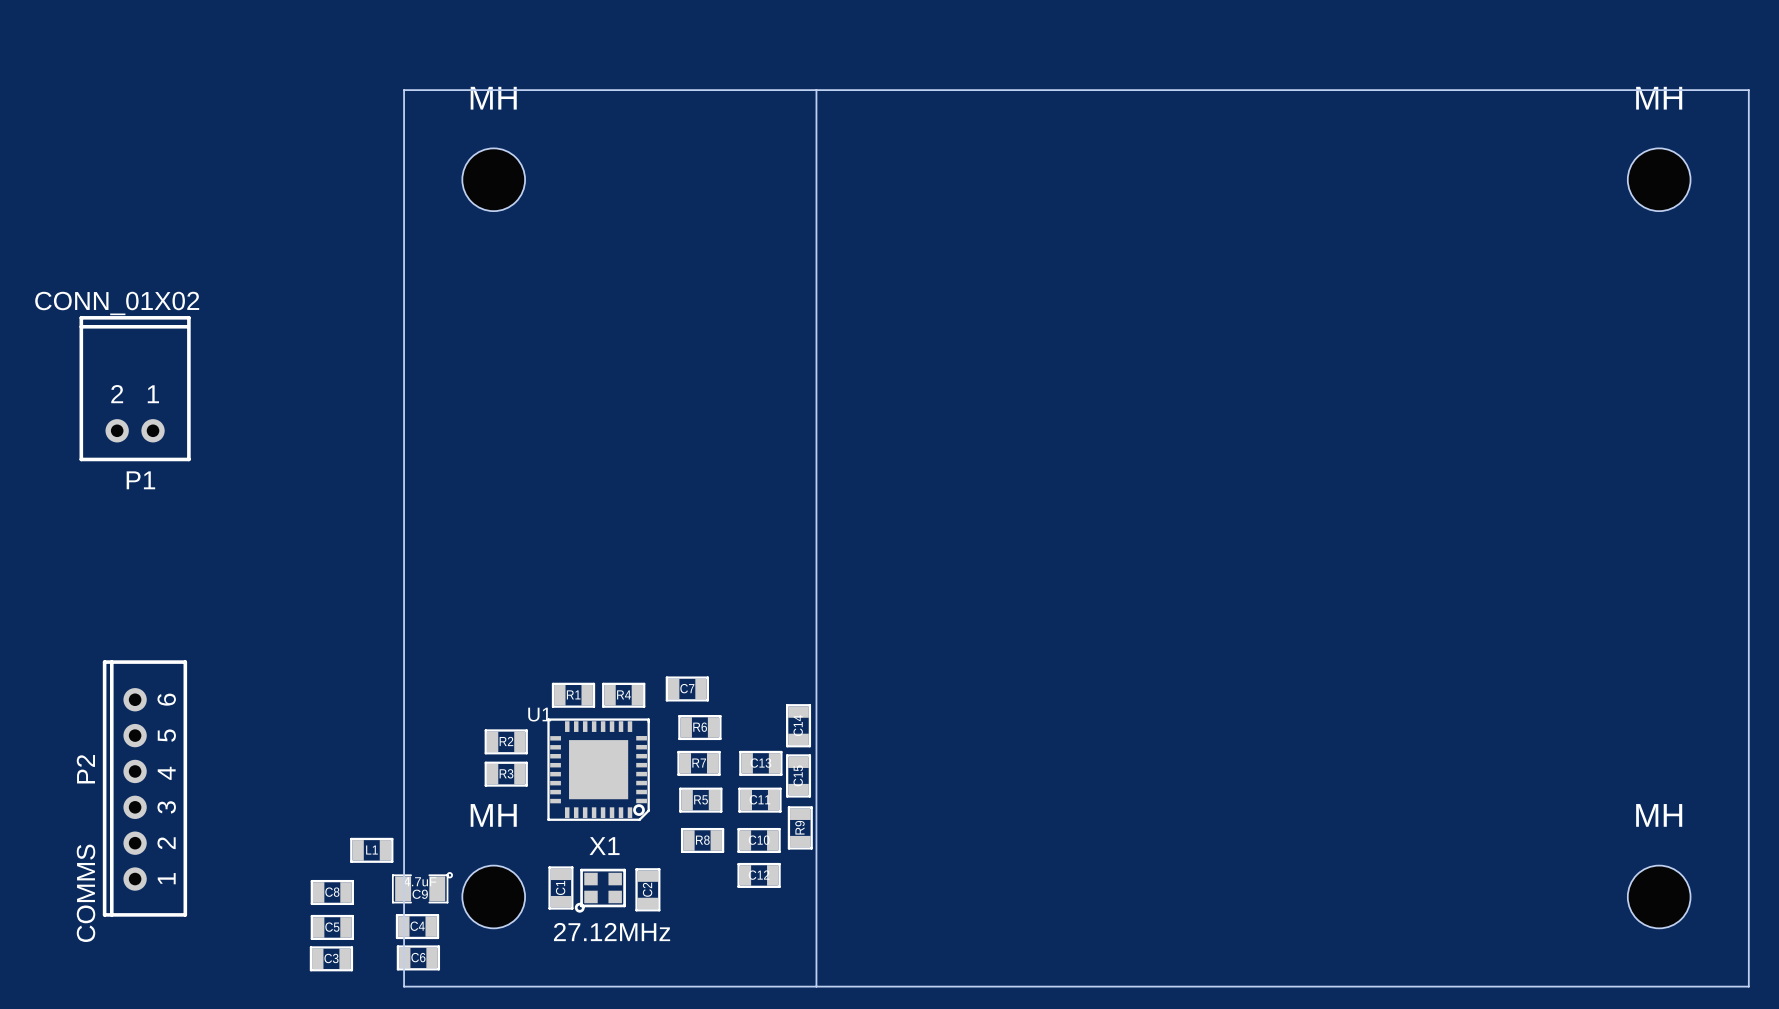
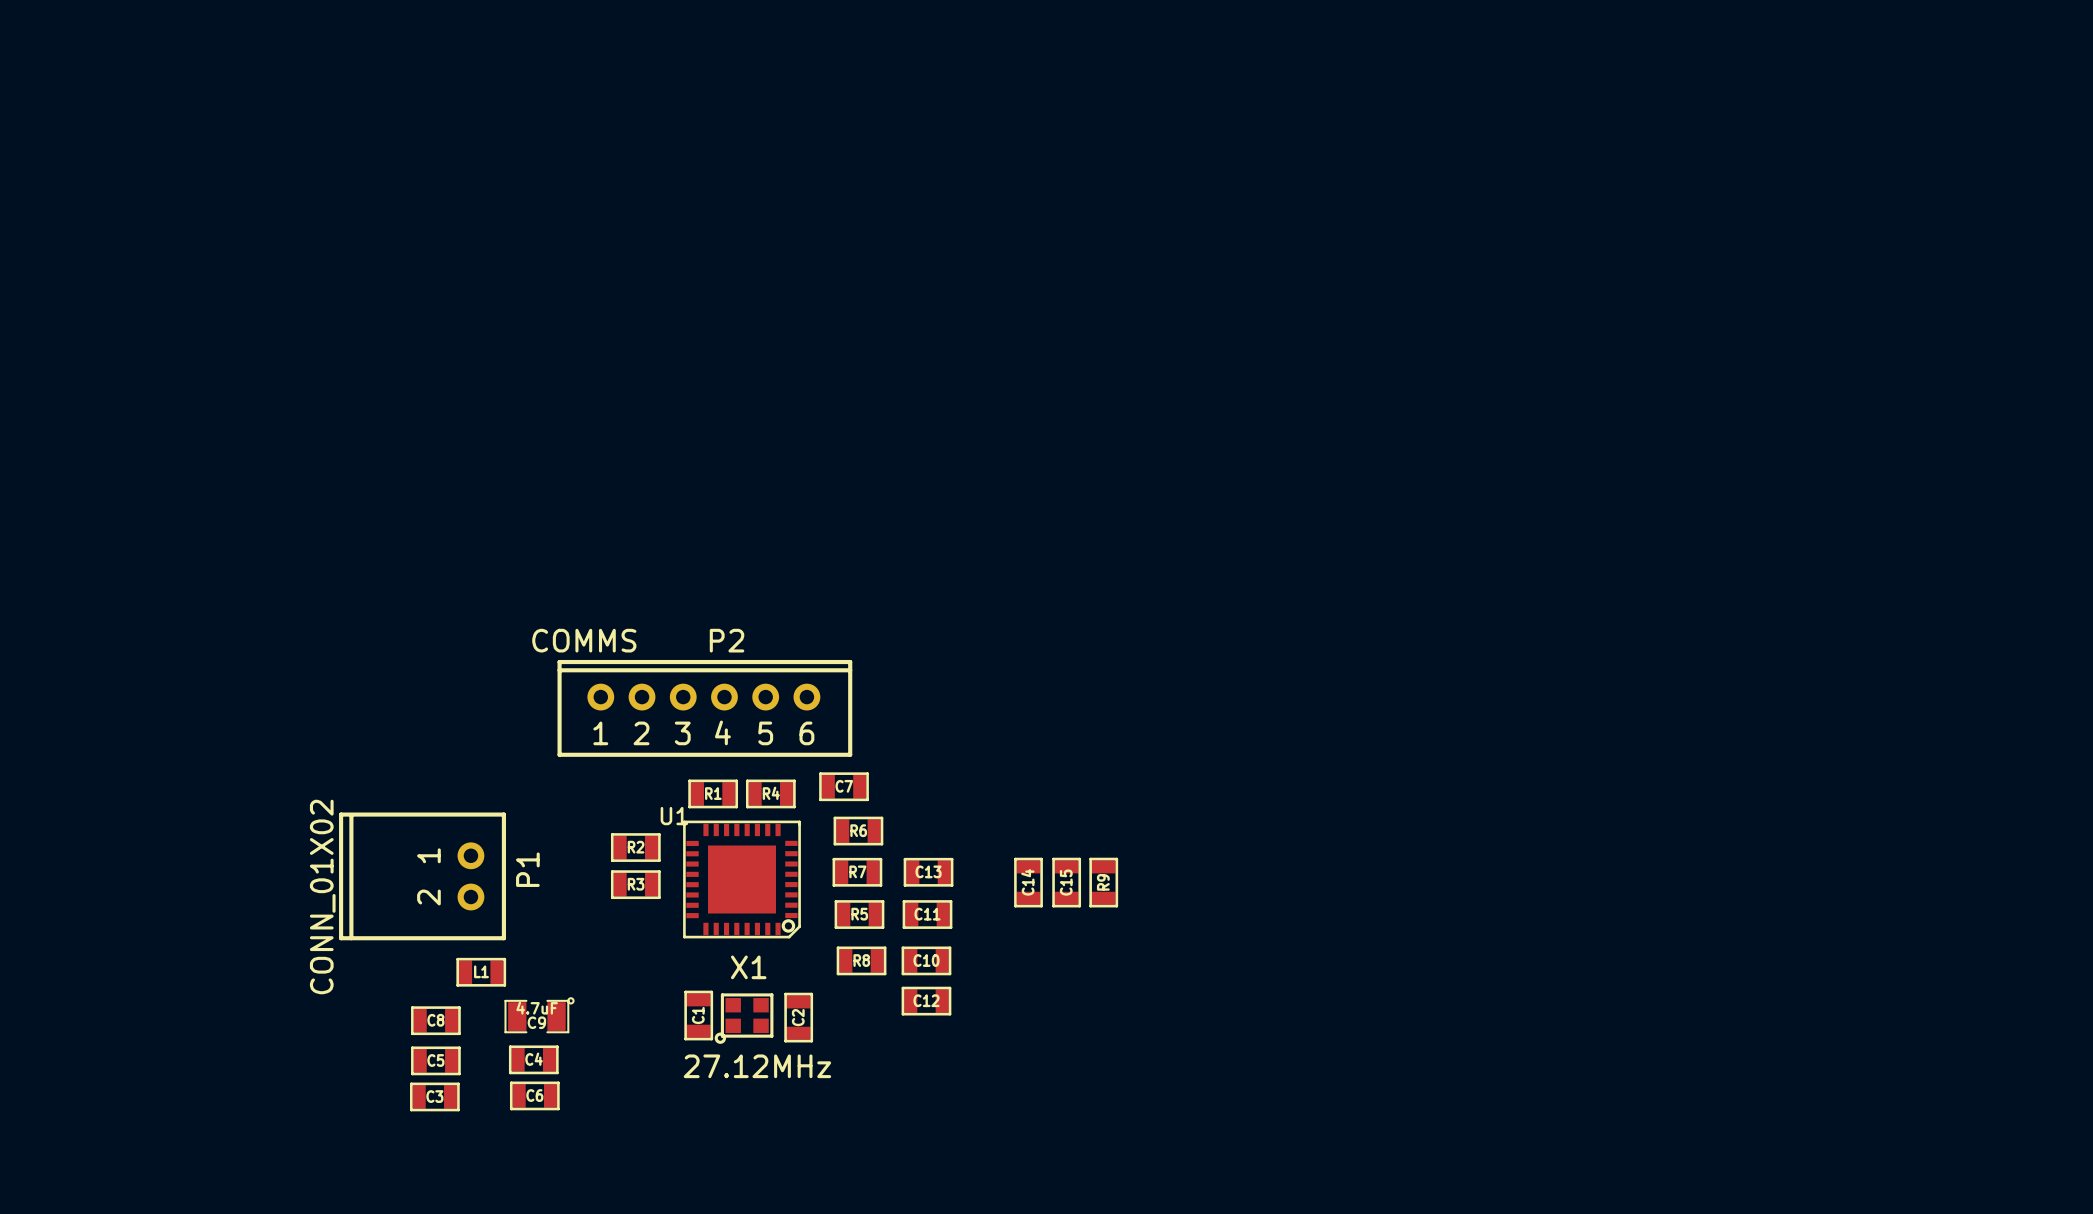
board edge: (404, 90) (404, 986) (1748, 986) (1748, 90) (404, 90) -> none
board edge: (816, 90) (816, 986) -> none
MH: (493, 179) -> none
MH: (1659, 179) -> none
P1 rotation: 0° (135, 388) -> 90° counterclockwise (422, 876)
P1 position: (135, 388) -> (422, 876)
C14 position: (798, 725) -> (1028, 882)
C15 position: (798, 775) -> (1066, 882)
P2 rotation: 0° (144, 788) -> 90° clockwise (704, 708)
P2 position: (144, 788) -> (704, 708)
R9 position: (800, 827) -> (1103, 882)
MH: (493, 896) -> none
MH: (1659, 896) -> none

